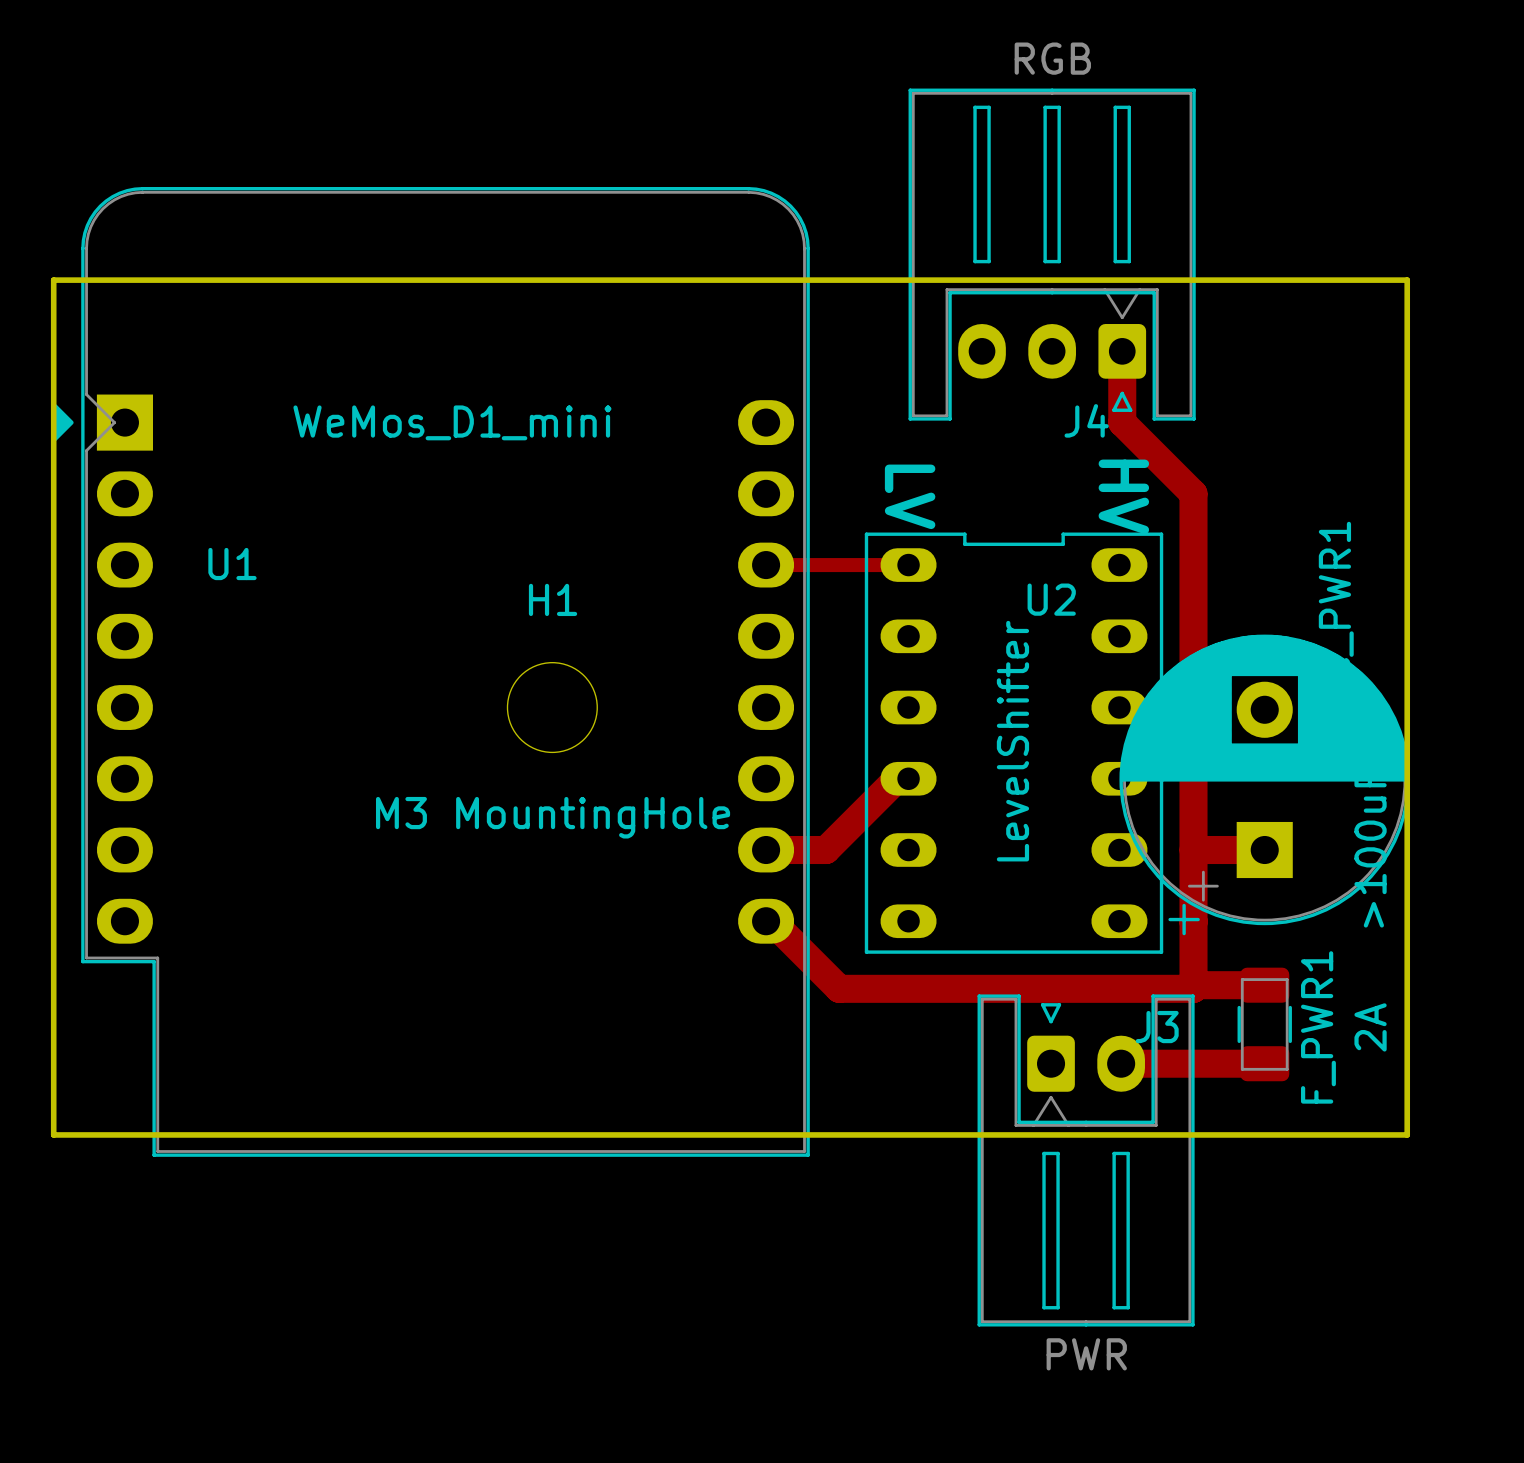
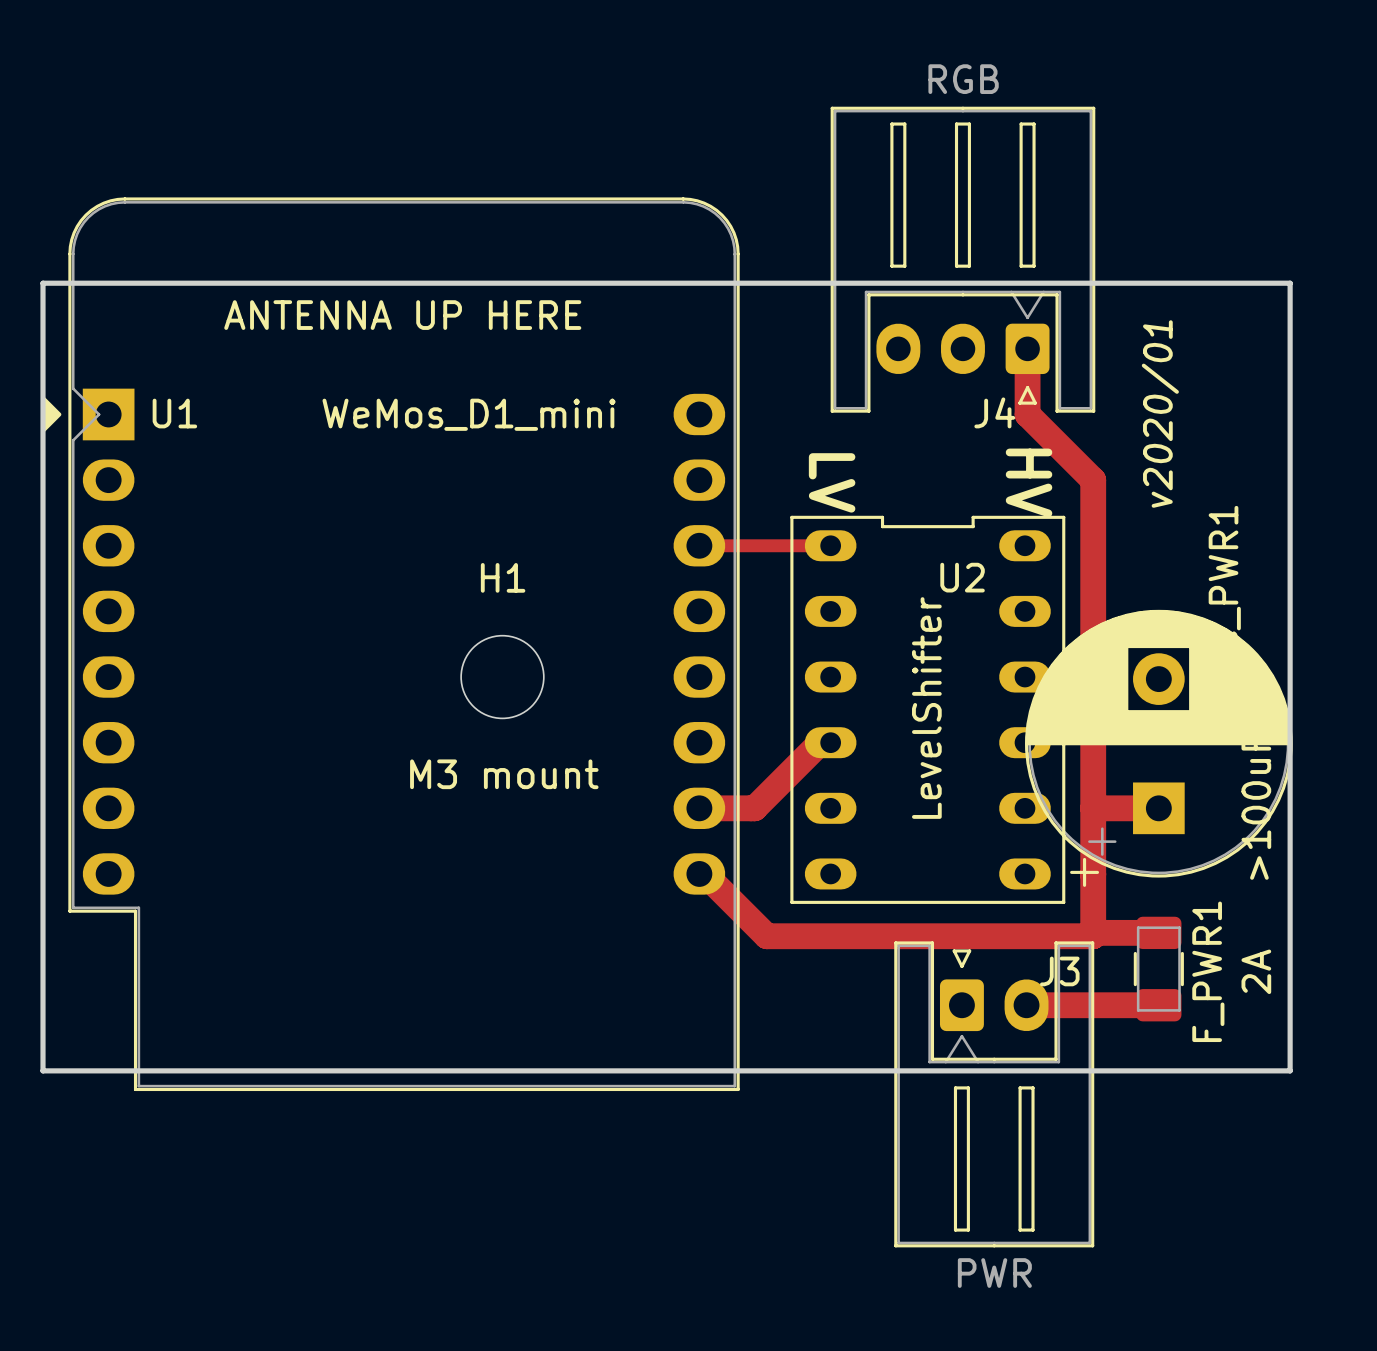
text: none -> ANTENNA UP HERE (402, 315)
U1 value position: WeMos_D1_mini (452, 422) -> WeMos_D1_mini (469, 414)
text: none -> v2020/01 (1160, 414)
U1 name position: U1 (232, 564) -> U1 (174, 413)
H1 value: M3 MountingHole (553, 817) -> M3 mount (504, 774)

